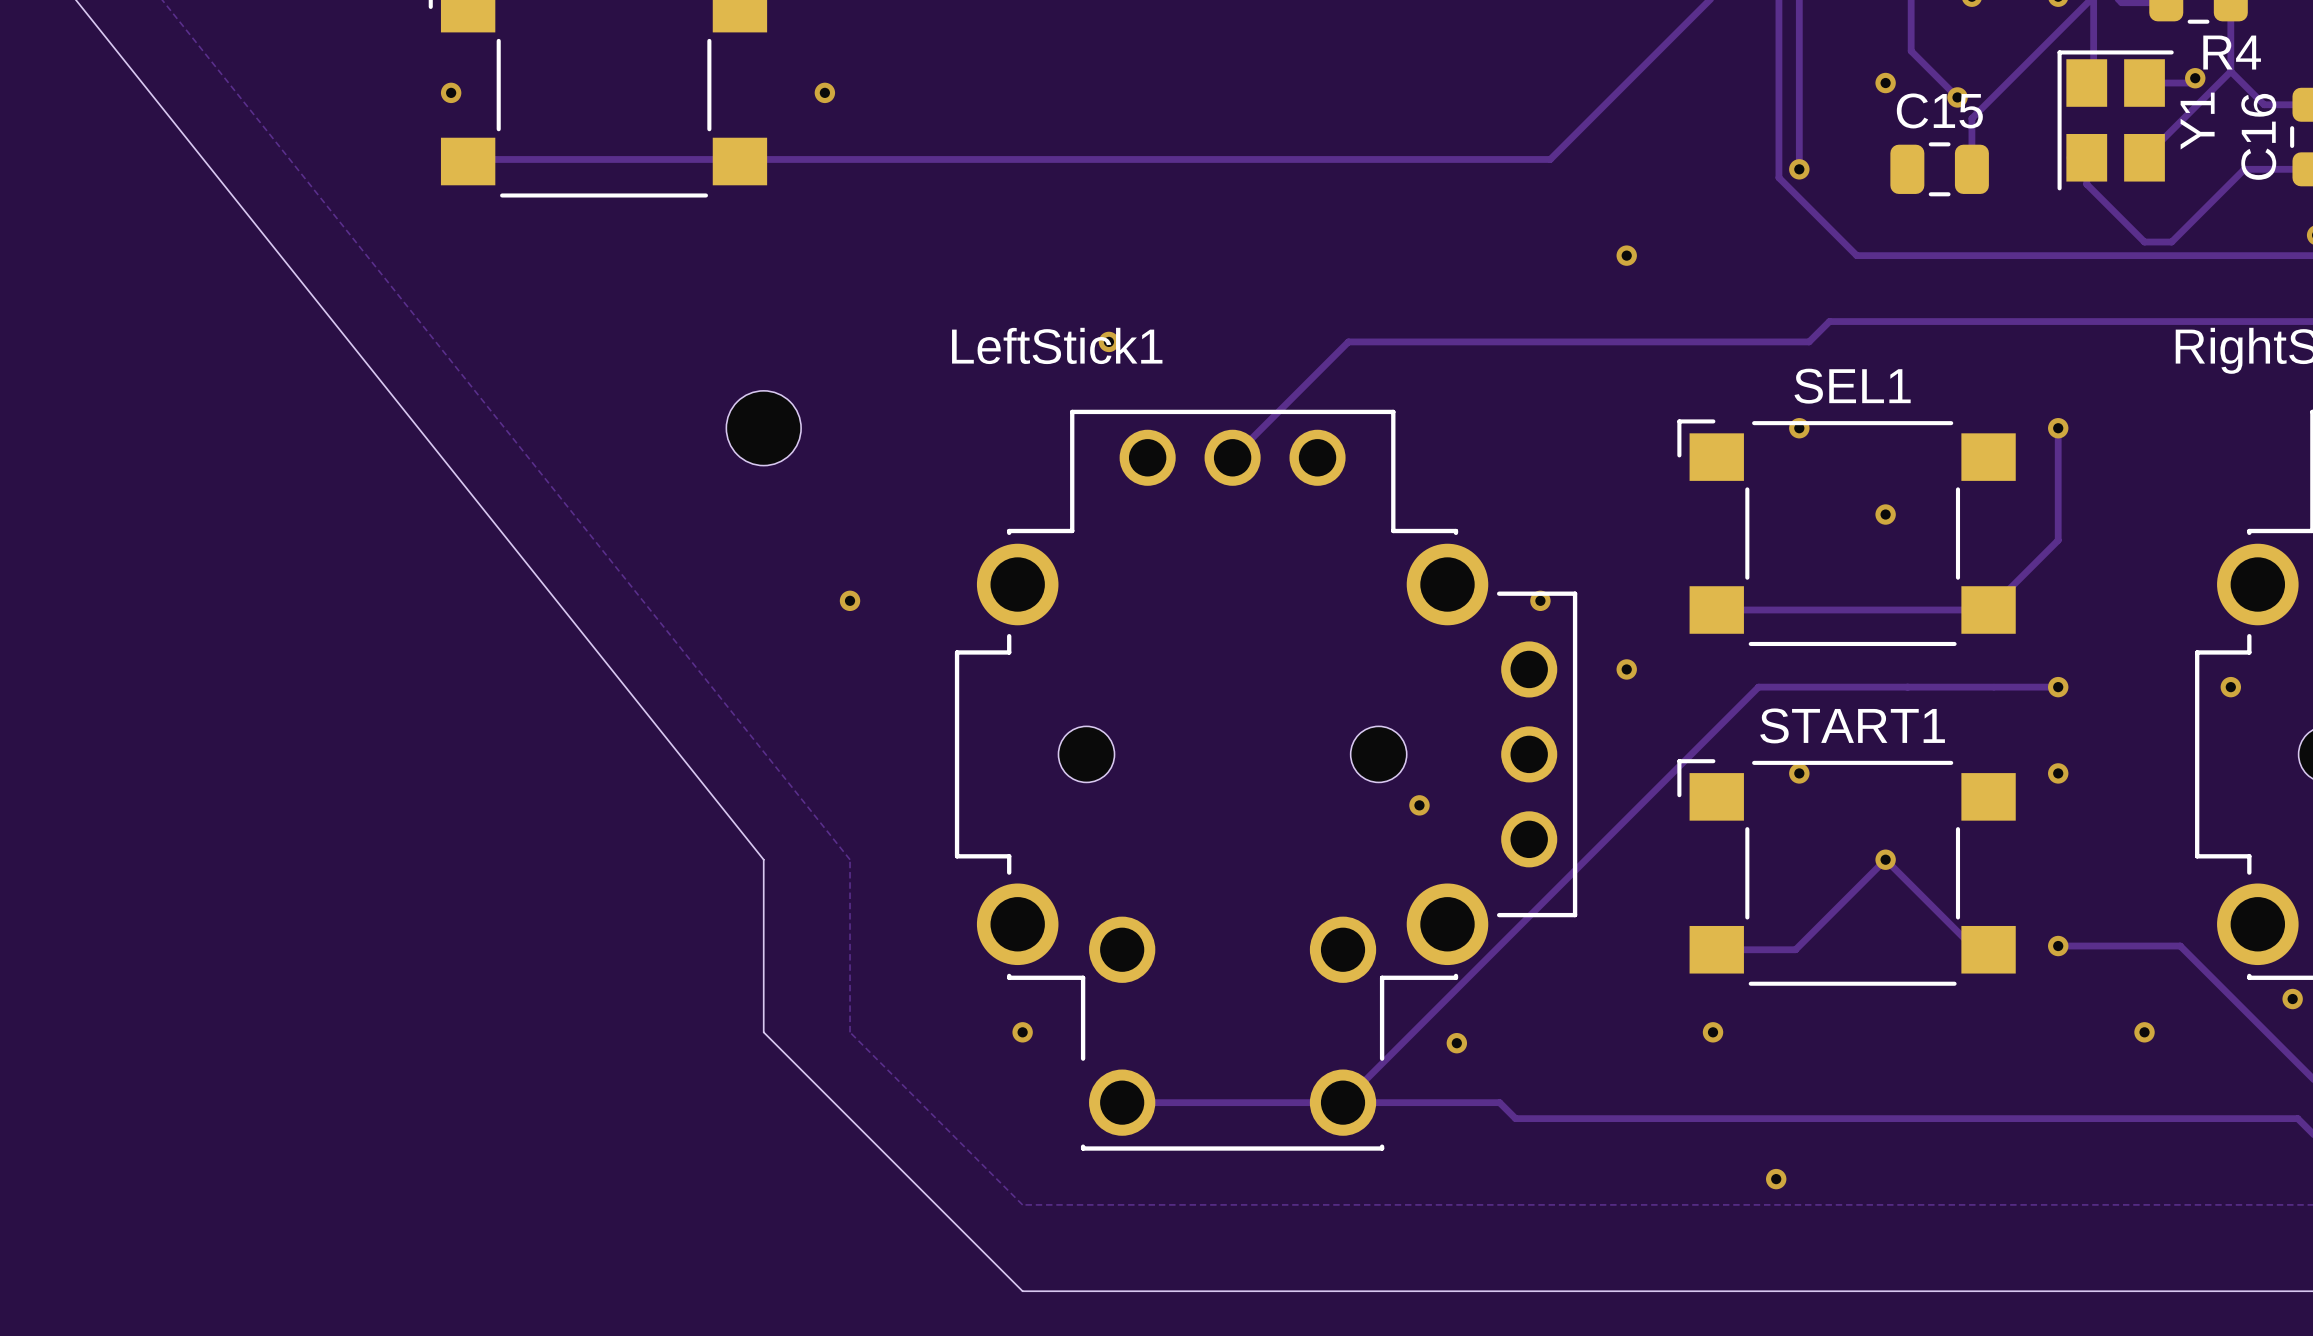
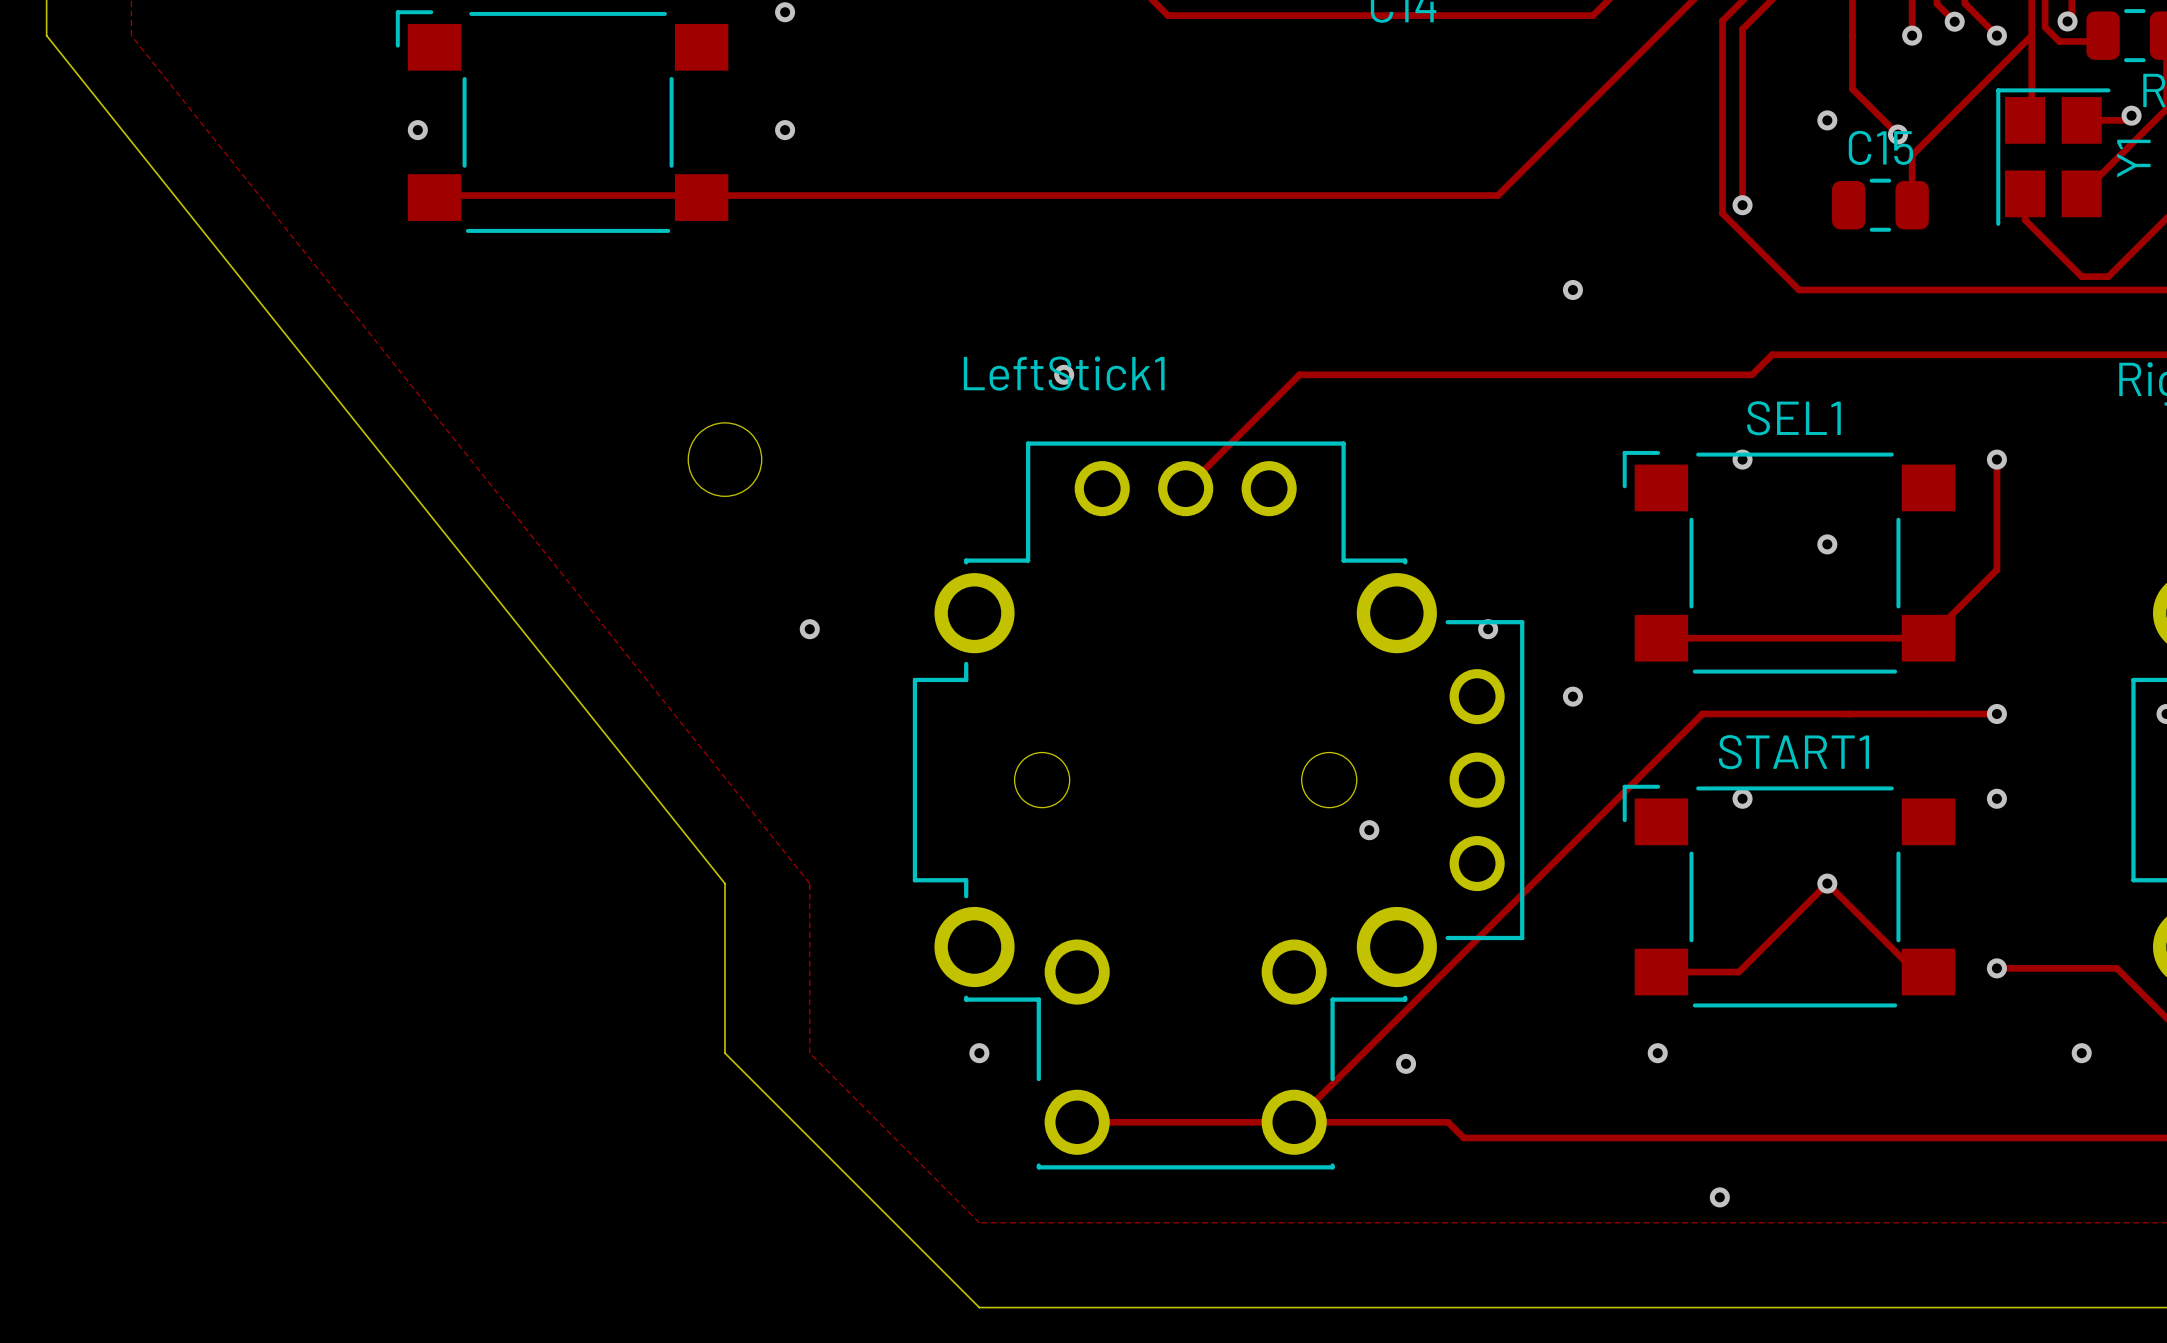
LeftStick1 name position: LeftStick1 (1057, 345) -> LeftStick1 (1064, 373)

